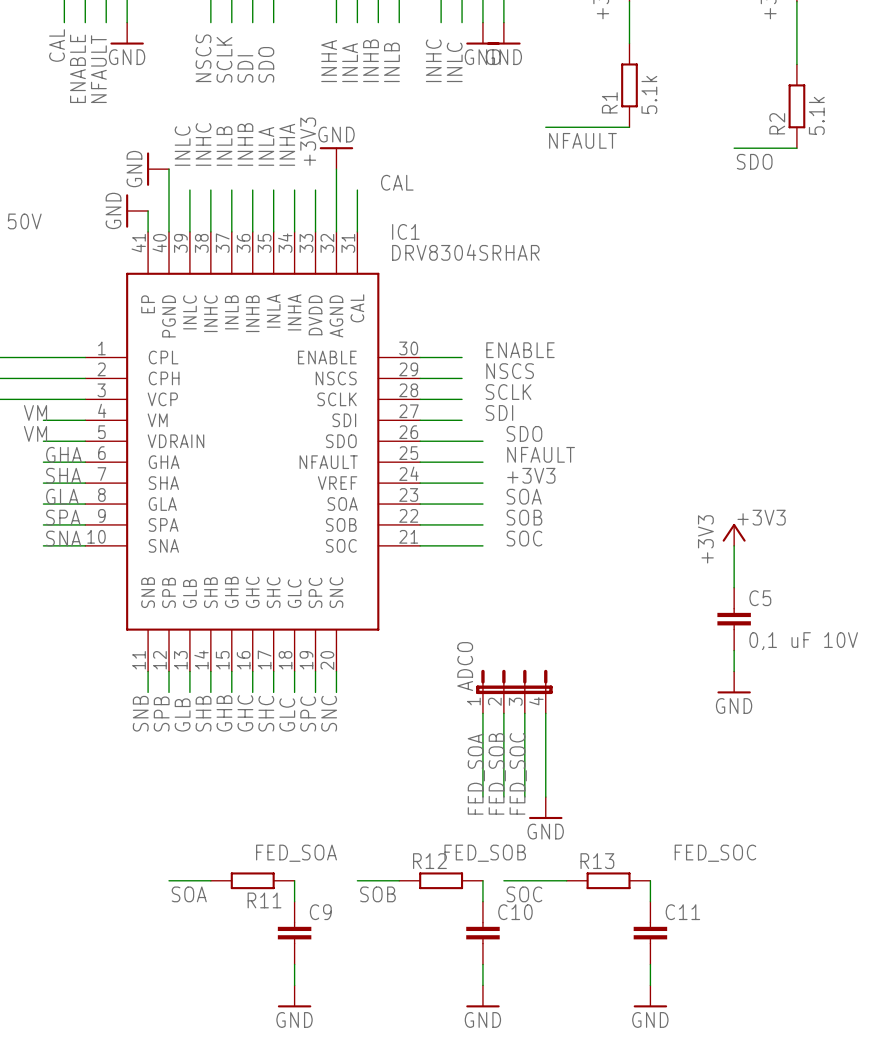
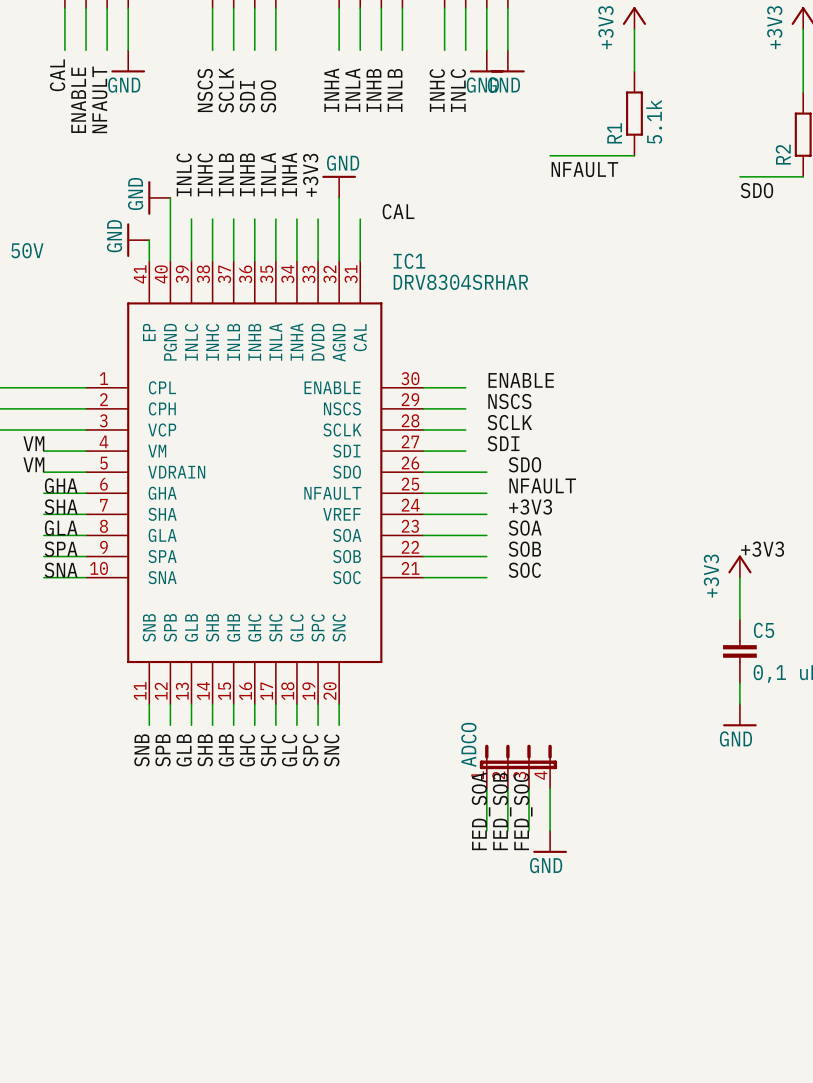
ADCO position: (514, 691) -> (518, 766)
label: FED_SOA (296, 853) -> none
label: FED_SOB (485, 853) -> none
label: FED_SOC (715, 853) -> none
wire: (169, 880) (210, 880) -> none
R11: (252, 880) -> none
wire: (294, 880) (294, 901) -> none
wire: (357, 880) (399, 880) -> none
R12: (441, 880) -> none
wire: (482, 880) (482, 901) -> none
wire: (503, 880) (566, 880) -> none
R13: (608, 880) -> none
wire: (650, 880) (650, 901) -> none
label: SOA (189, 894) -> none
label: SOB (377, 894) -> none
label: SOC (524, 894) -> none
C9: (294, 933) -> none
C10: (482, 933) -> none
C11: (650, 933) -> none
wire: (294, 964) (294, 985) -> none
wire: (482, 964) (482, 985) -> none
wire: (650, 964) (650, 985) -> none
power symbol: GND (294, 996) -> none
power symbol: GND (482, 996) -> none
power symbol: GND (650, 996) -> none

